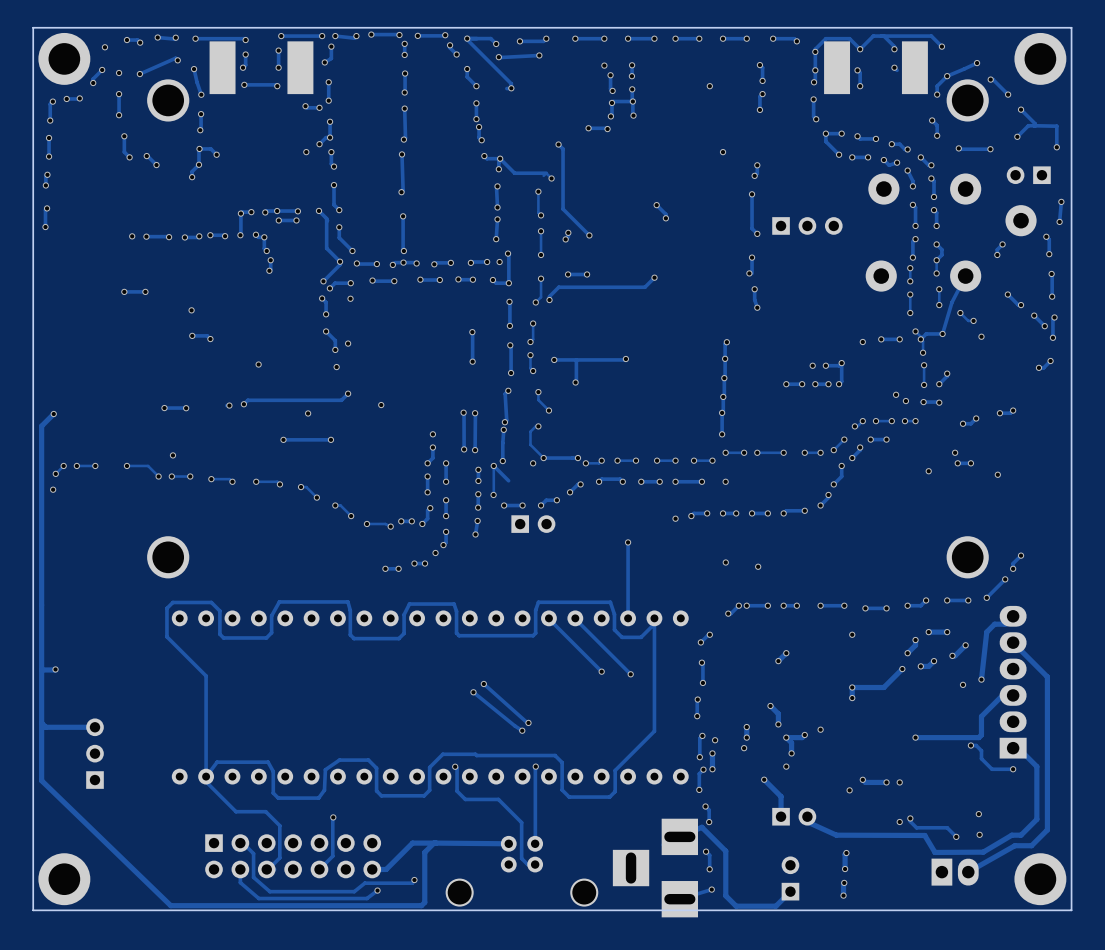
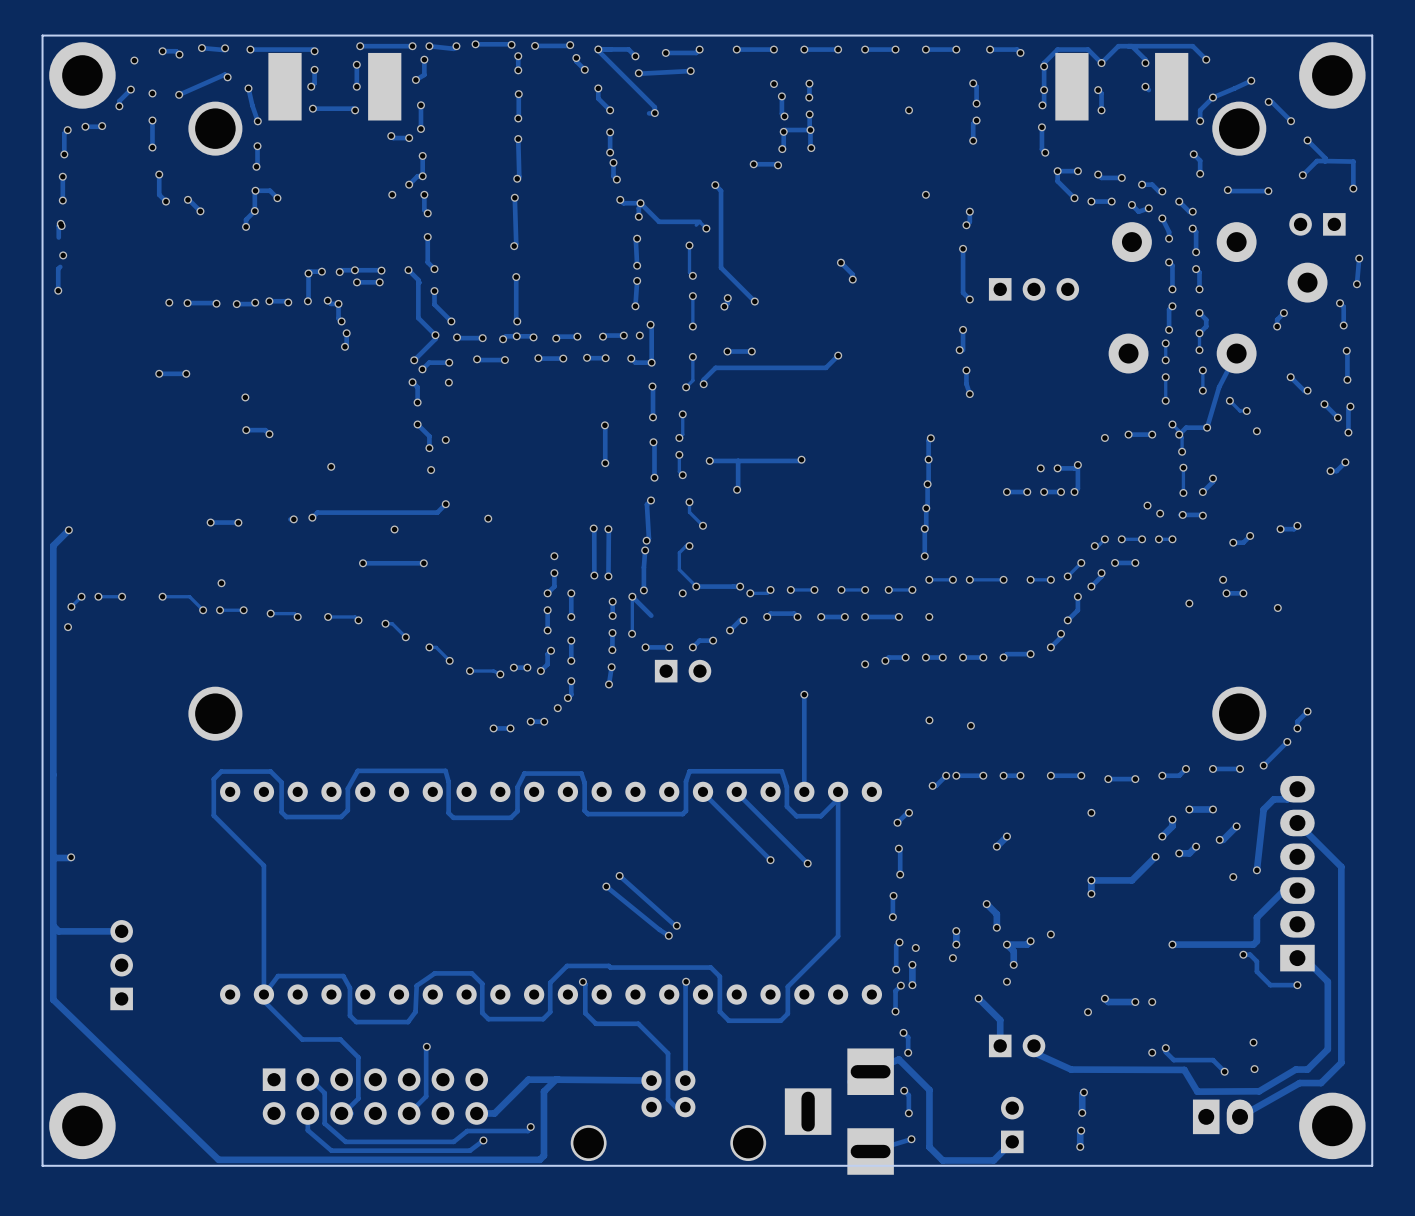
via: none -> (61, 226)
via: (45, 185) -> none
via: none -> (63, 255)
via: (47, 208) -> none

